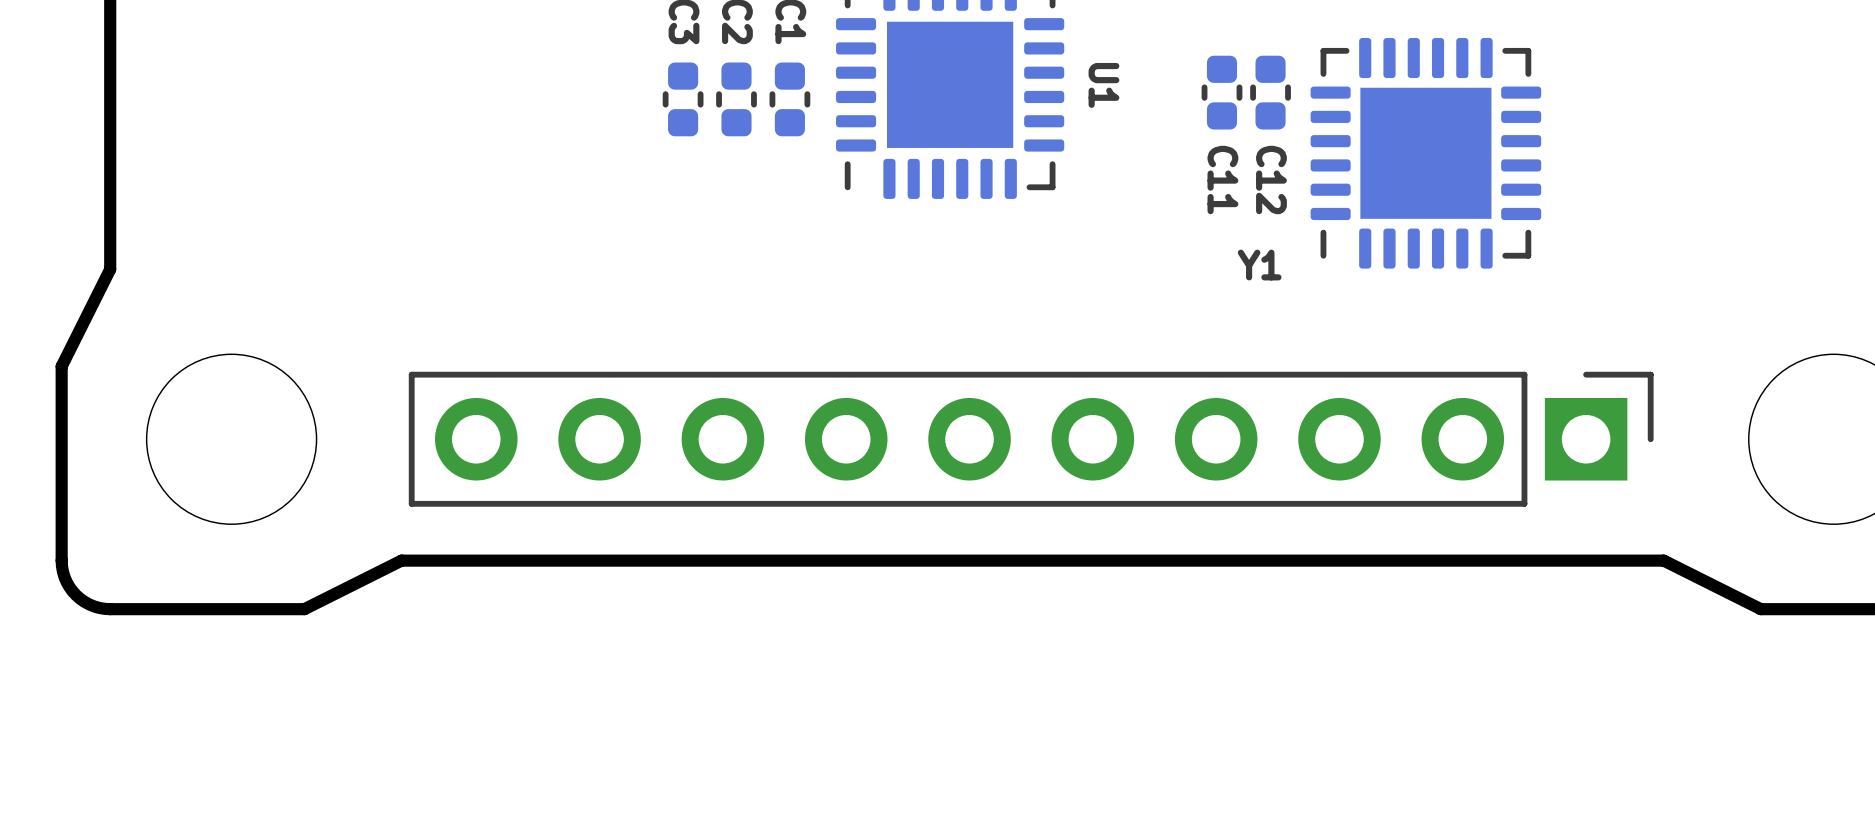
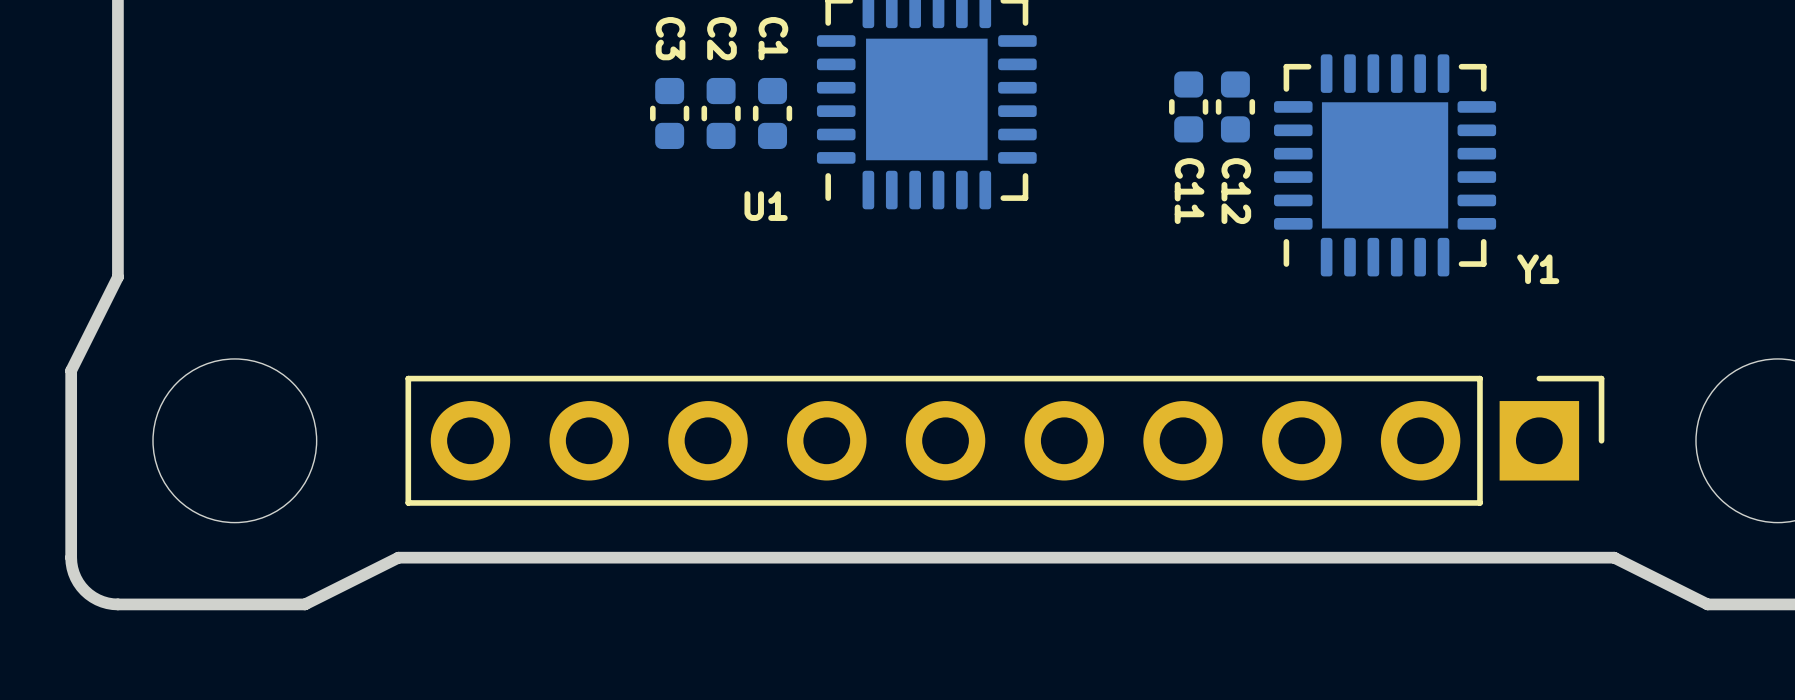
U1 name rotation: 0° (1103, 85) -> 90° counterclockwise (766, 206)
U1 name position: U1 (1103, 85) -> U1 (766, 206)
Y1 name position: Y1 (1259, 265) -> Y1 (1538, 269)

